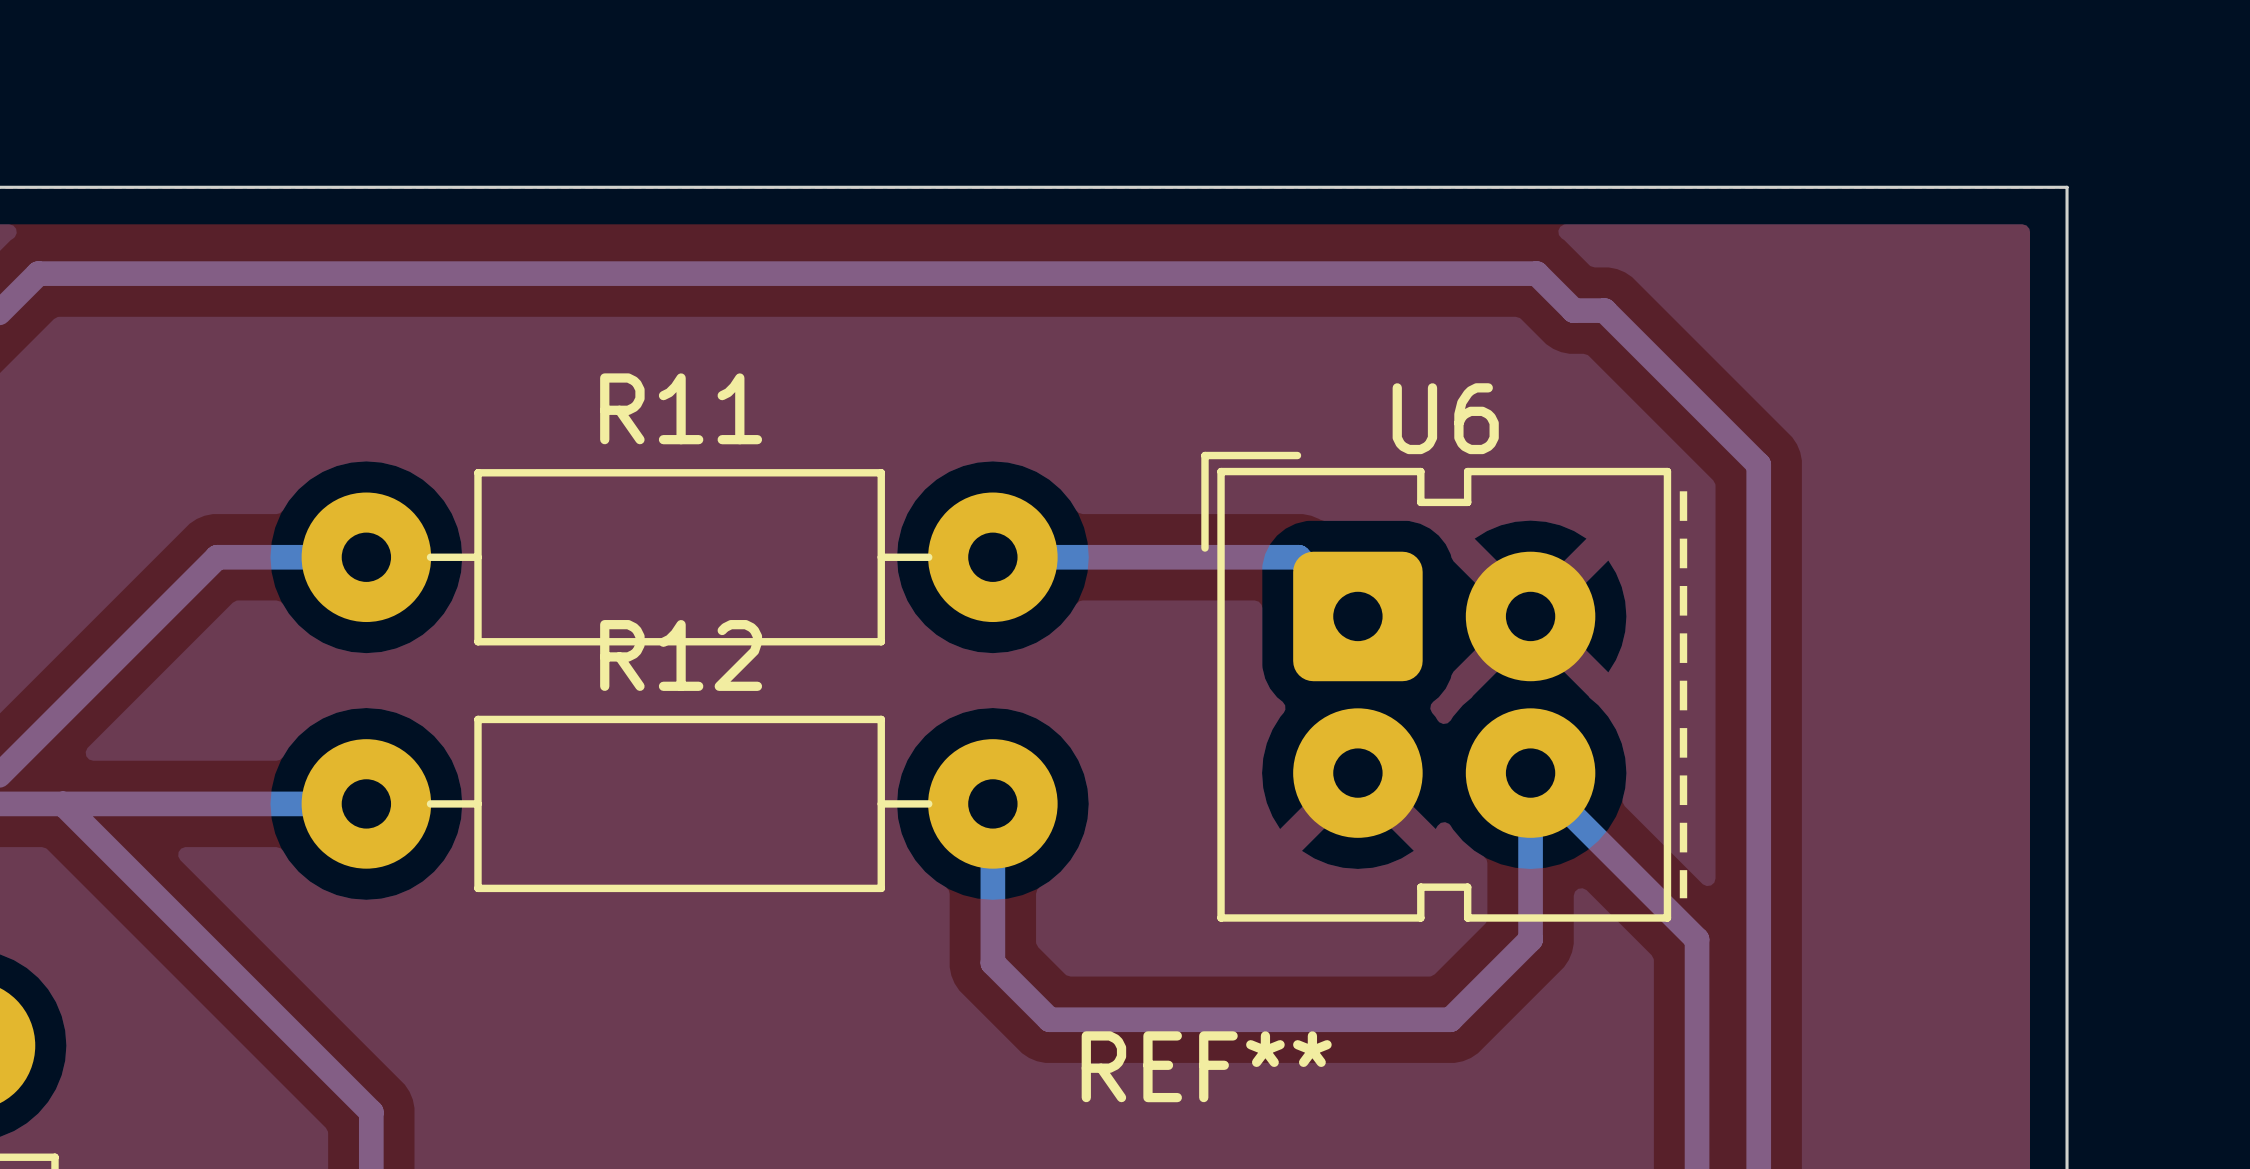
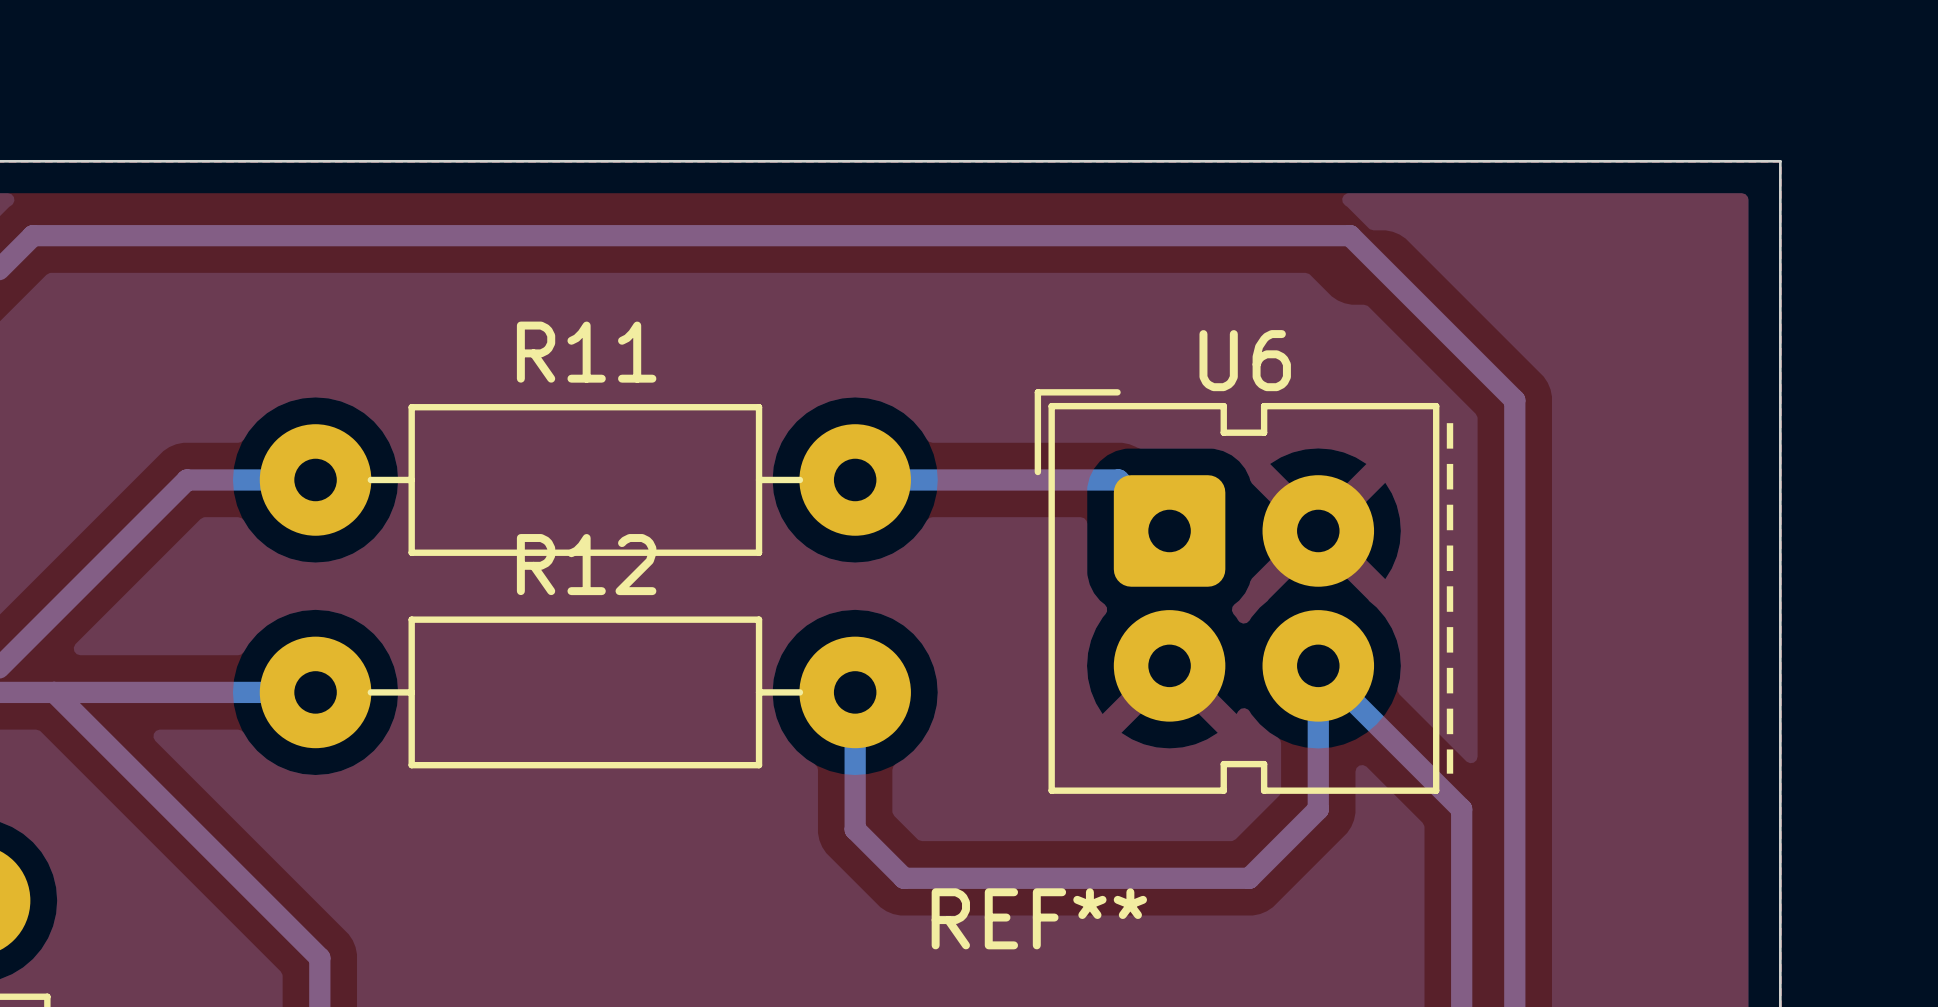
bottom track: (1536, 273) (1573, 310) (1604, 310) -> (1323, 235) (1350, 235) (1382, 267)

